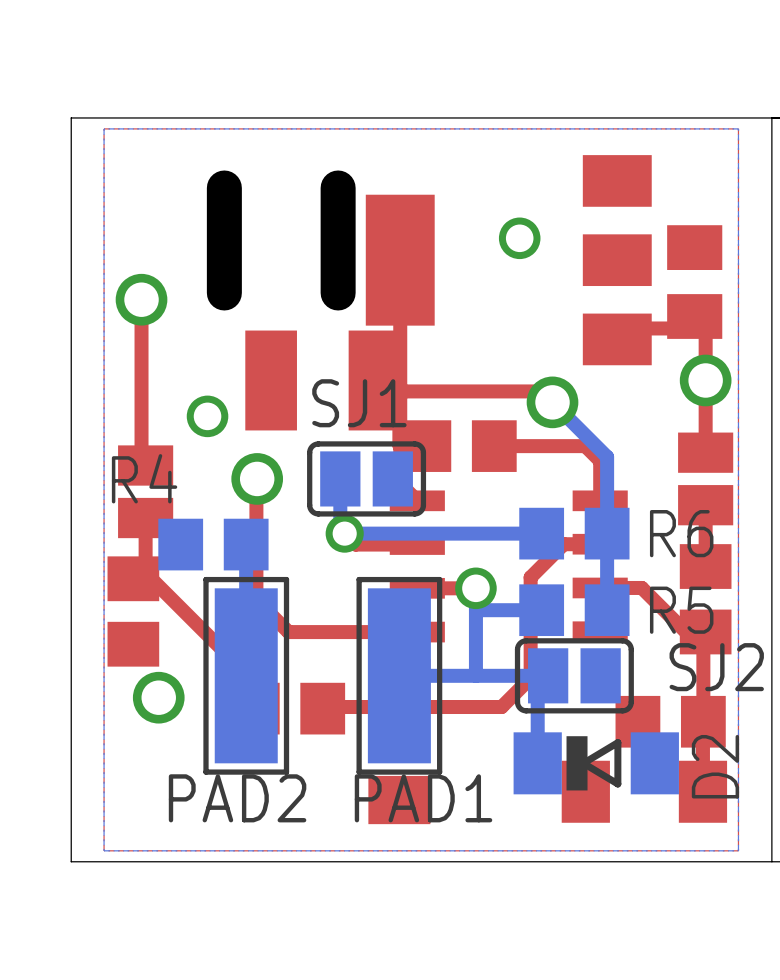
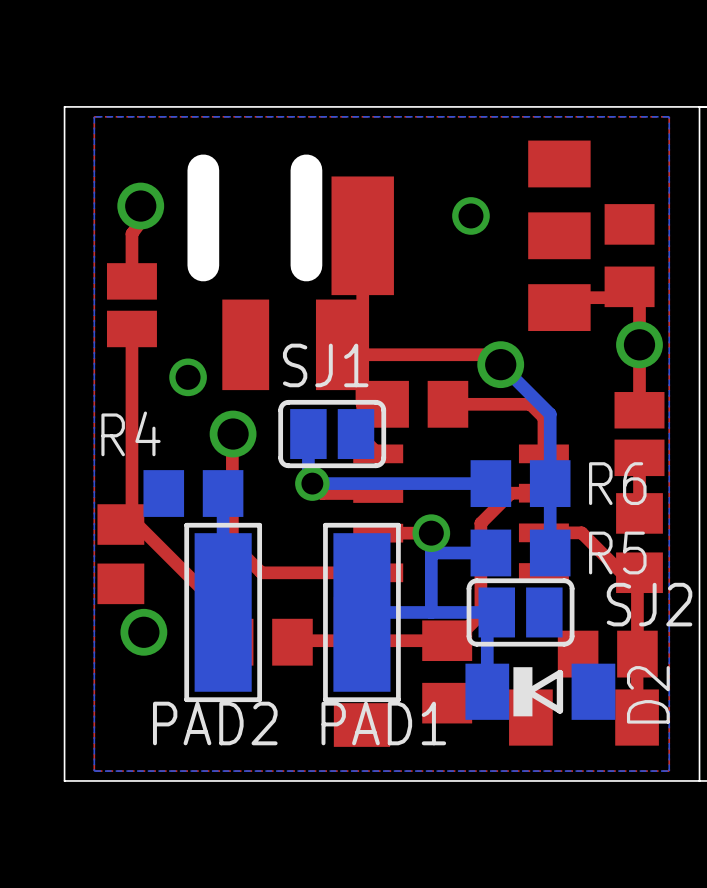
top track: none -> (140, 206) (140, 221) (131, 233) (131, 281)
top track: (141, 299) (141, 461) (145, 465) -> none
via position: (141, 299) -> (140, 206)
top track: none -> (131, 328) (131, 469)
part position: (145, 491) -> (131, 305)
part: none -> (447, 671)

